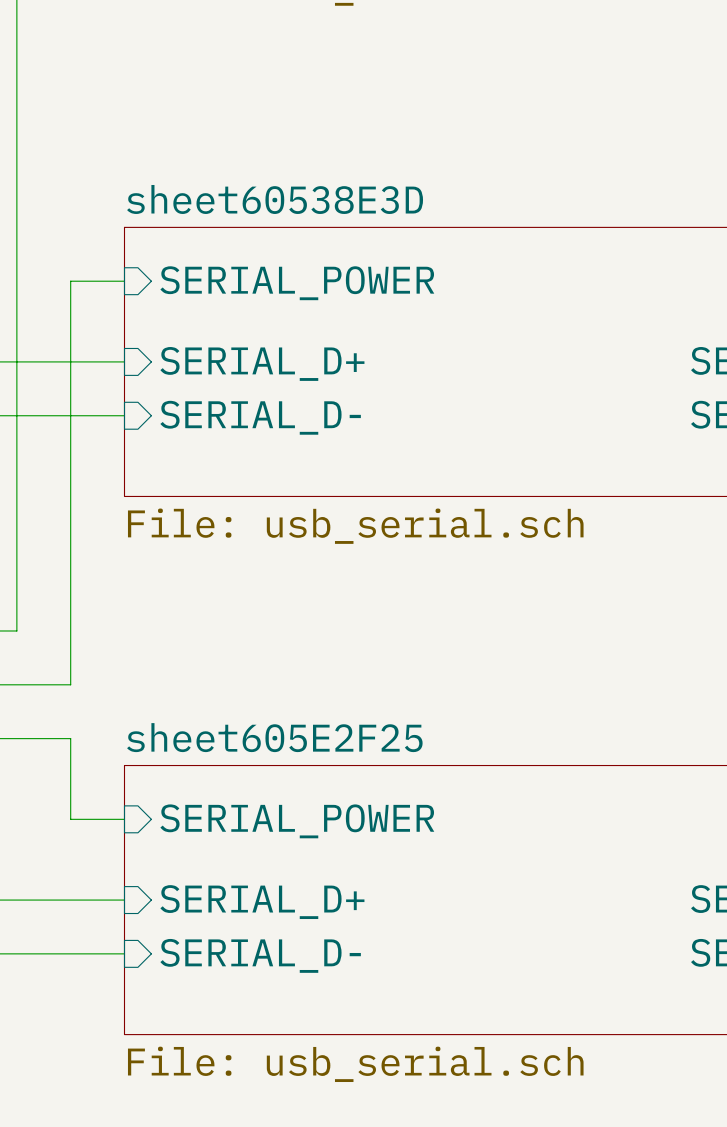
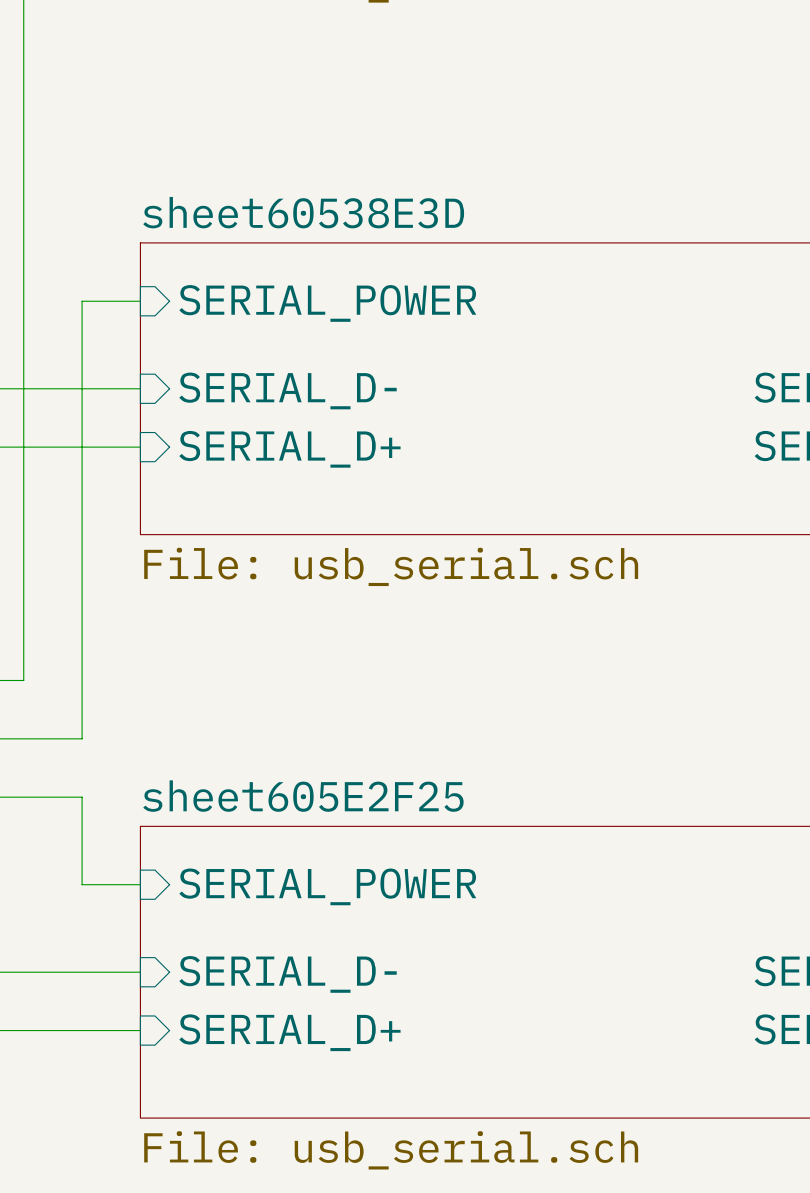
sheet pin: SERIAL_D+ (262, 363) -> SERIAL_D- (288, 390)
sheet pin: SERIAL_D- (260, 417) -> SERIAL_D+ (289, 449)
sheet pin: SERIAL_D+ (262, 902) -> SERIAL_D- (288, 974)
sheet pin: SERIAL_D- (260, 955) -> SERIAL_D+ (289, 1032)

